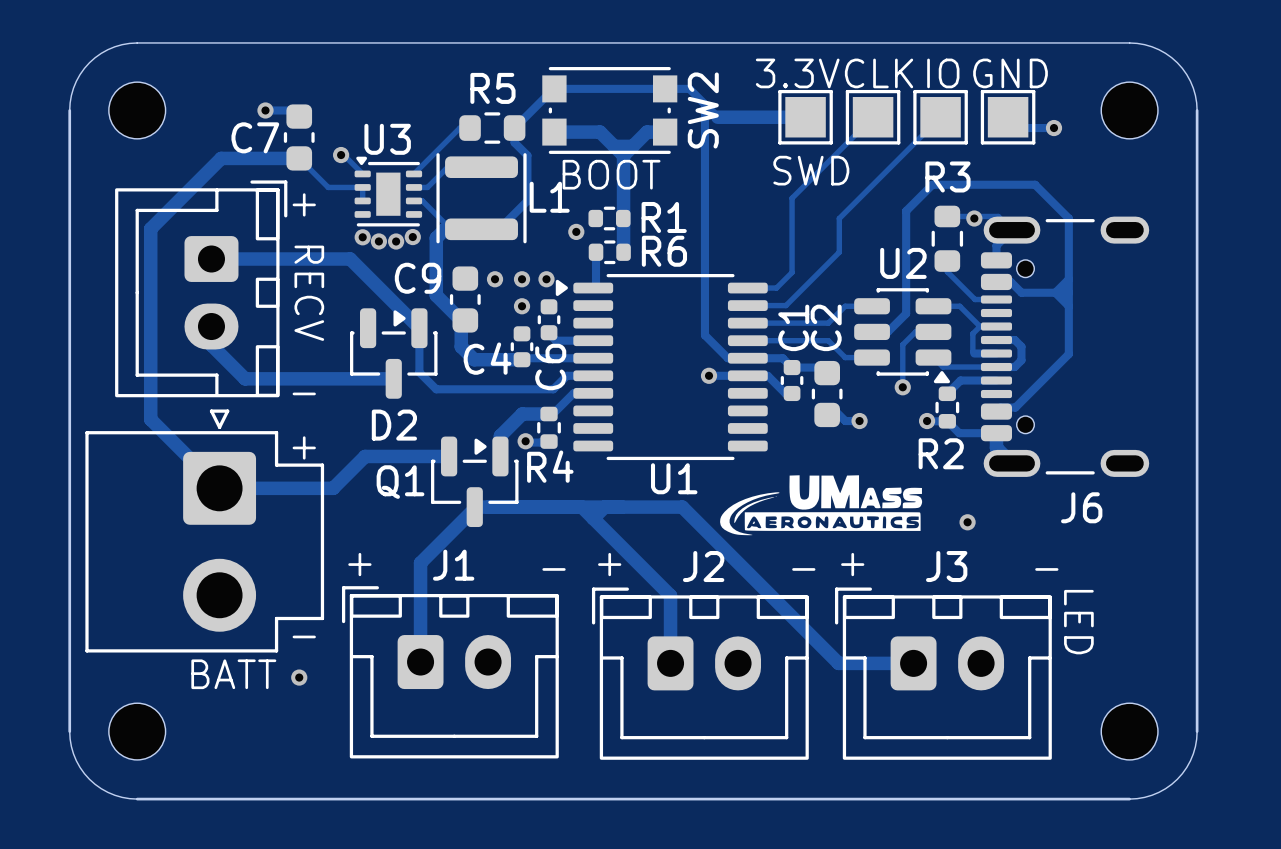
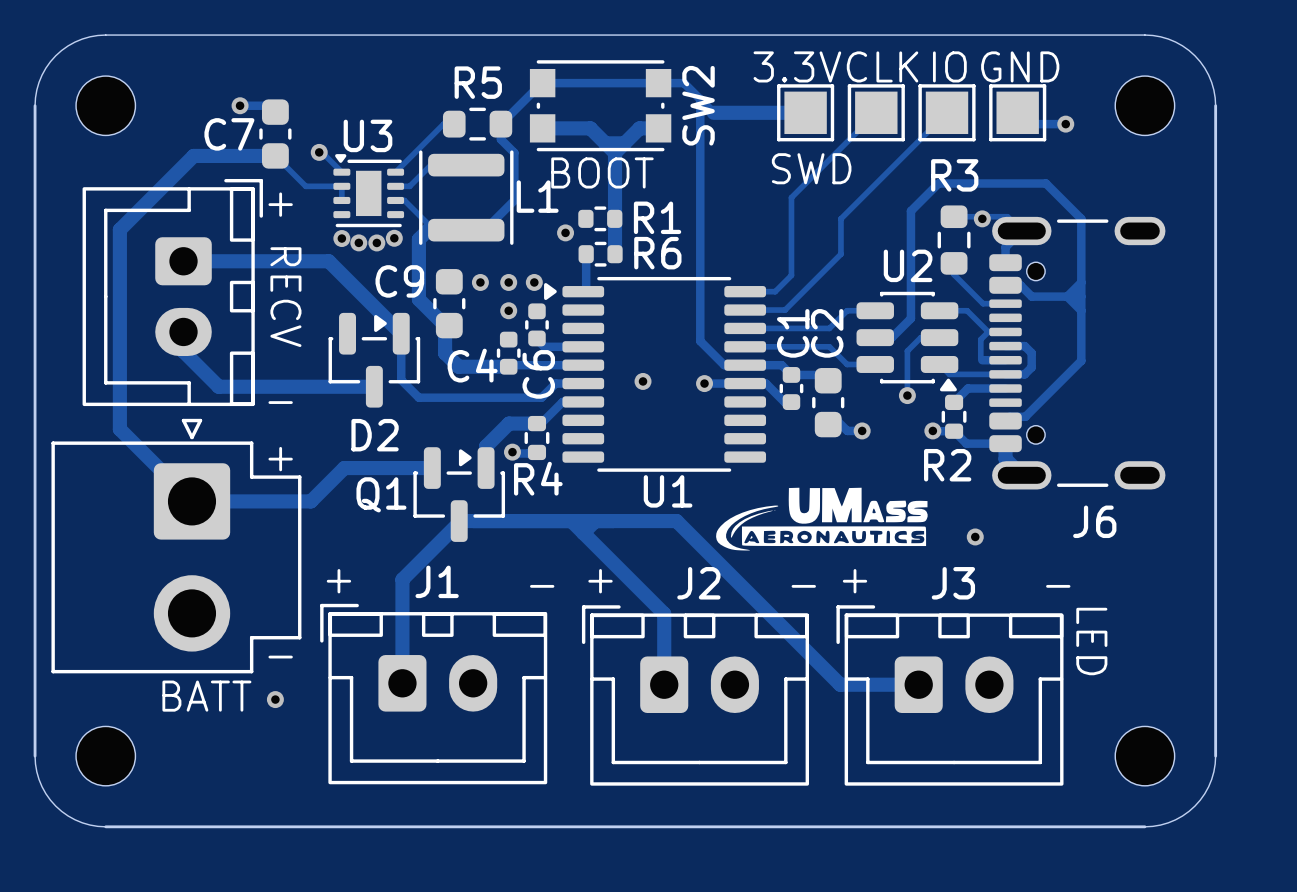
via: none -> (643, 381)

